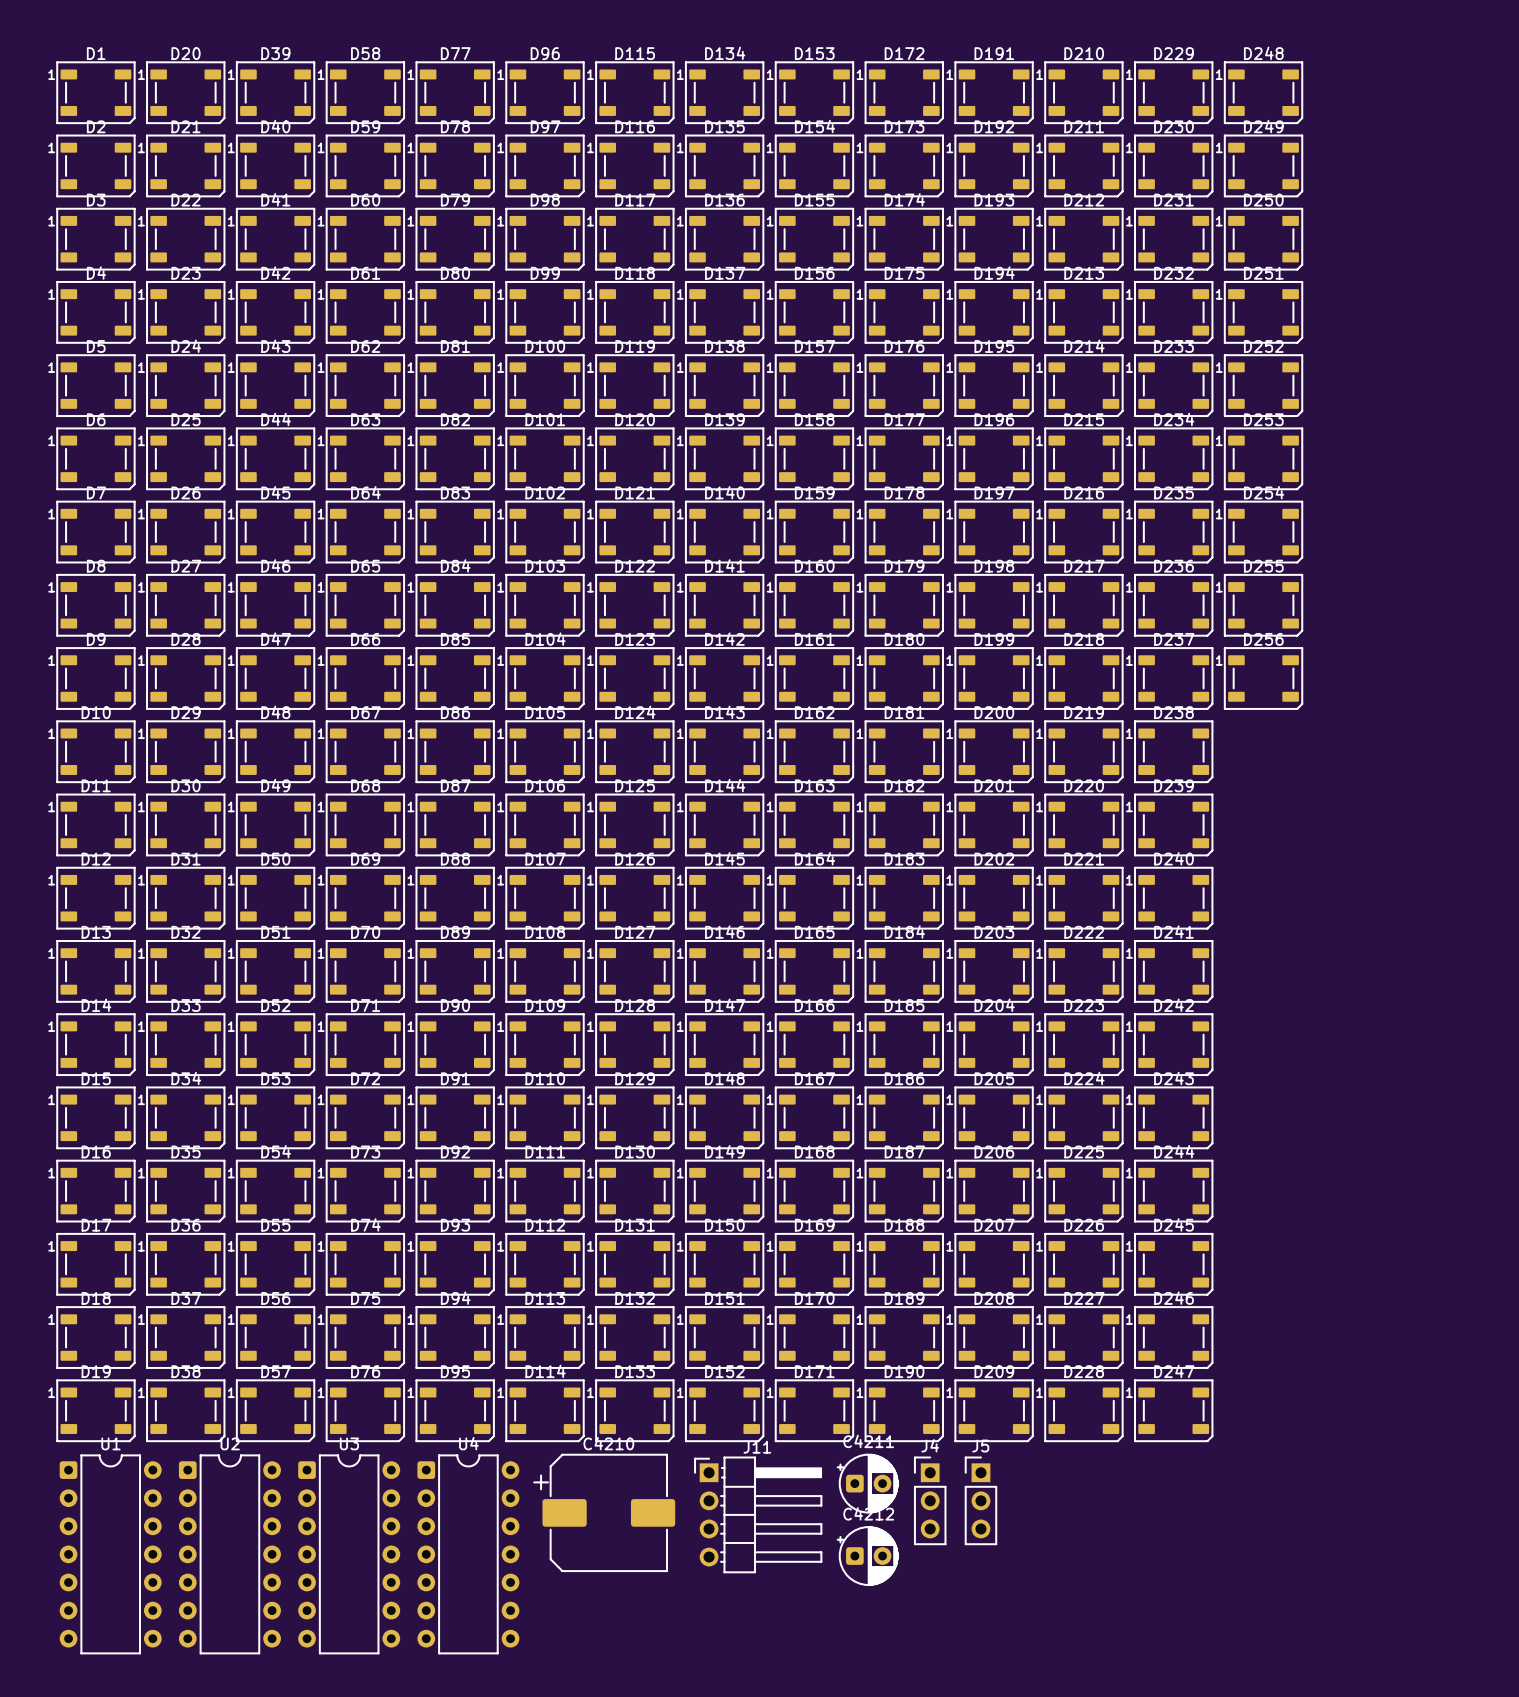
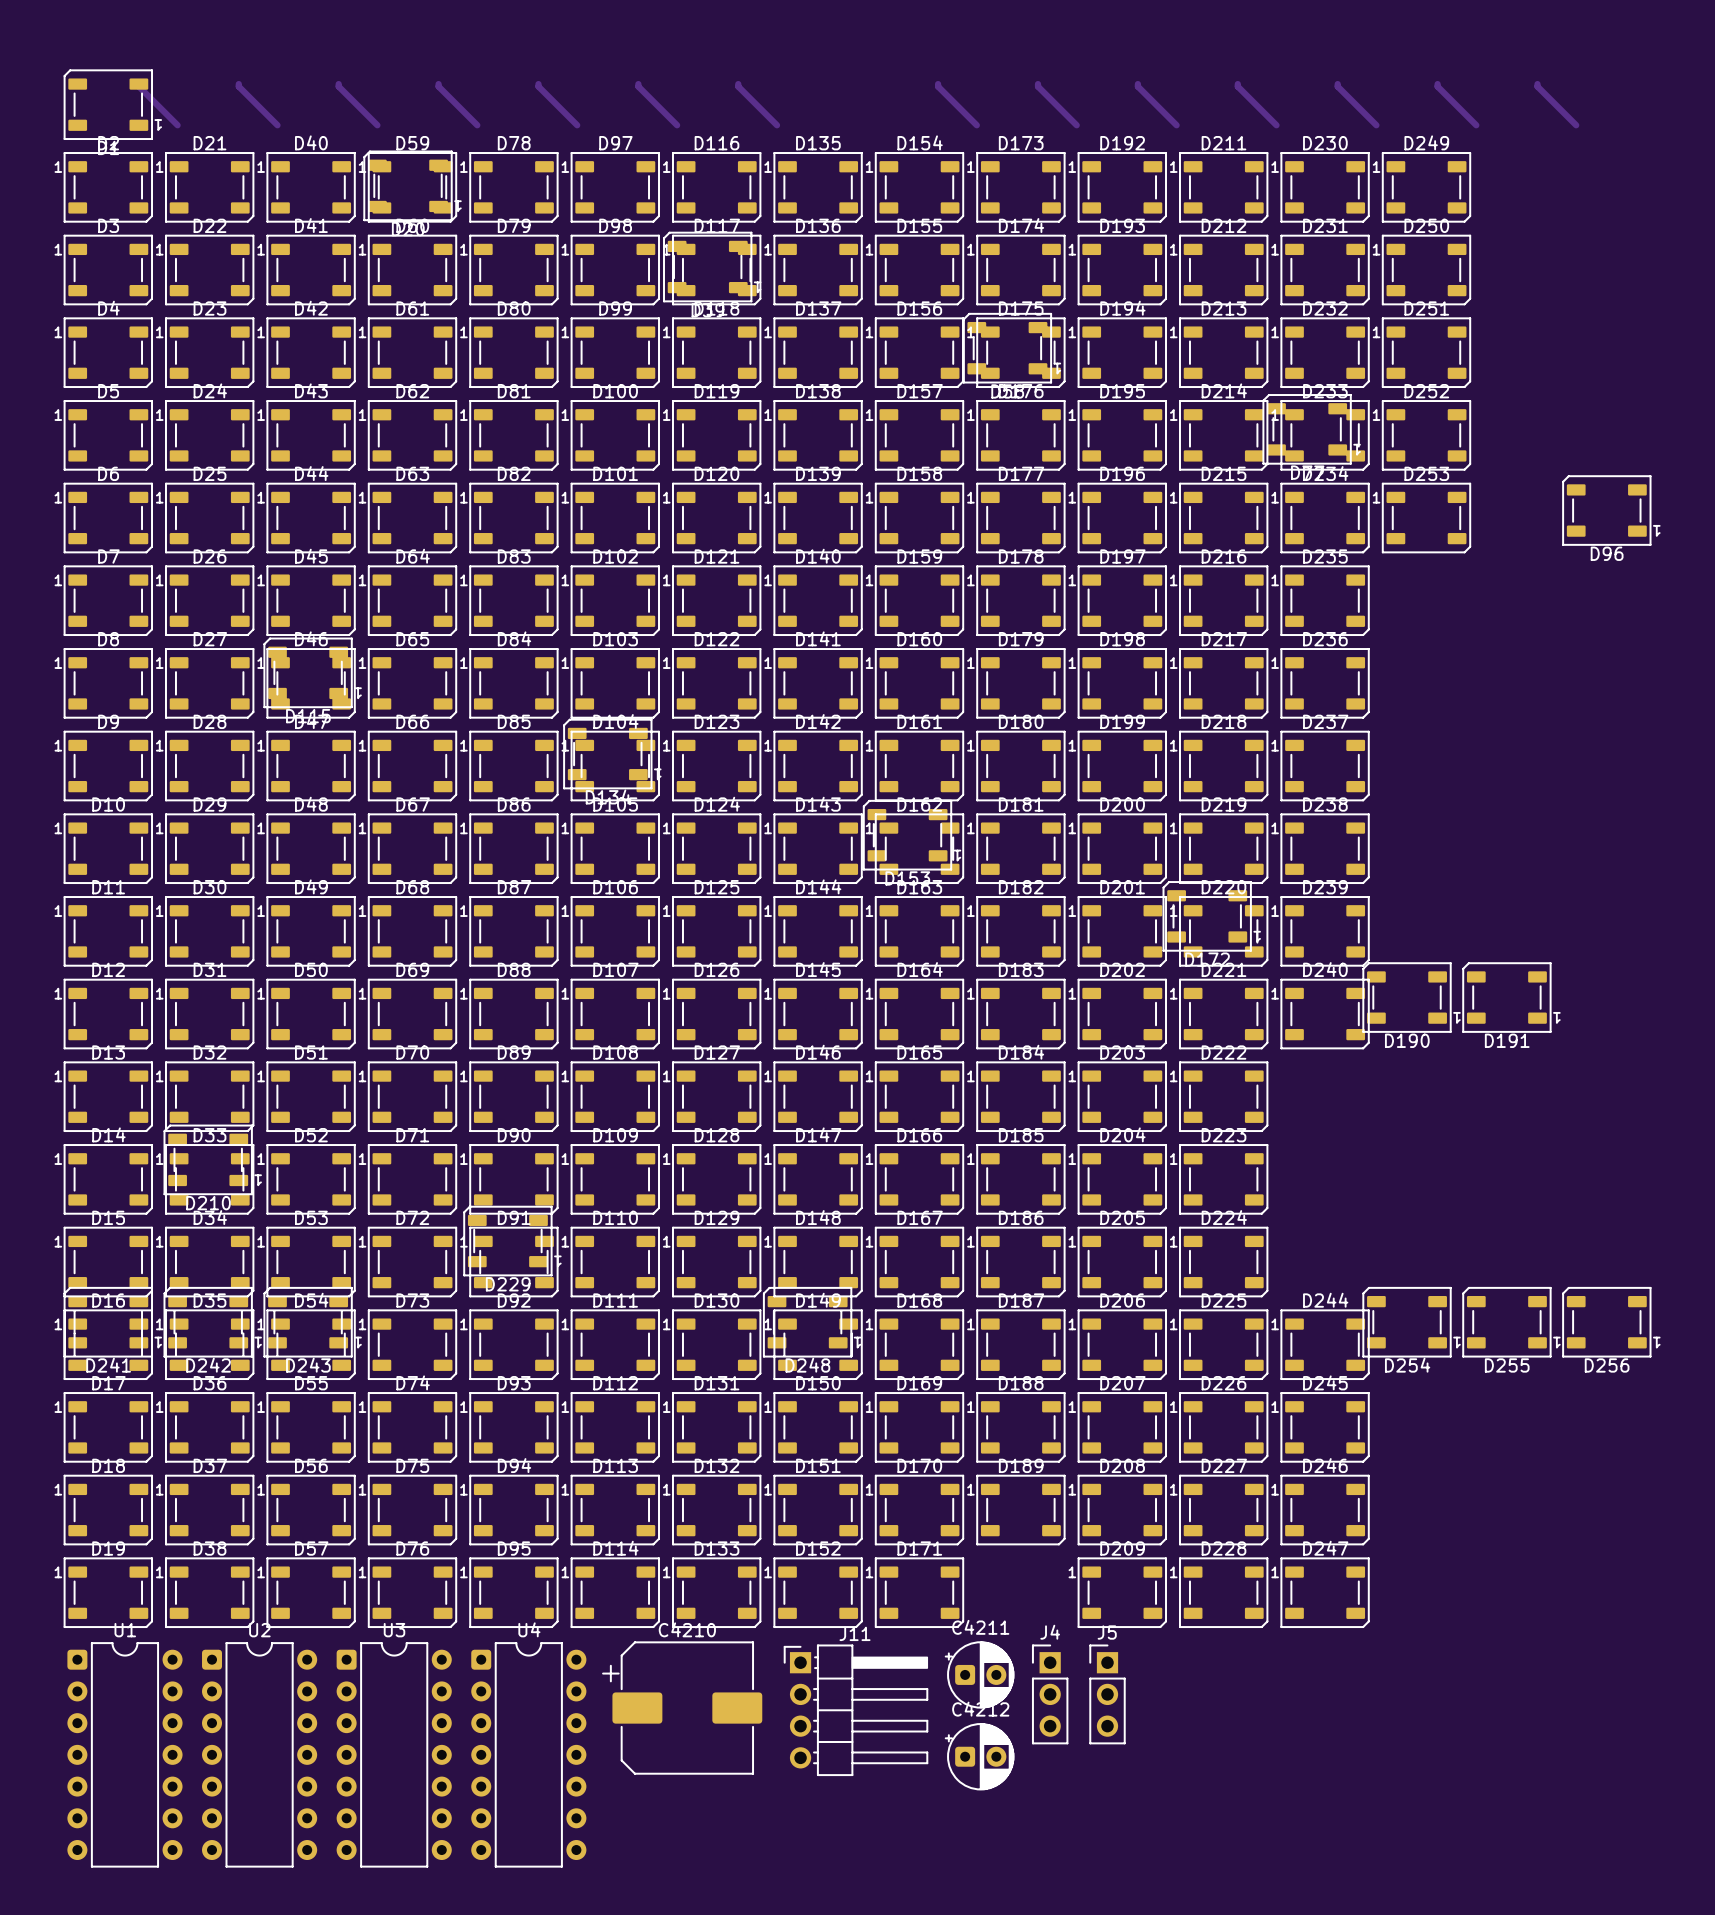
track: none -> (138, 84) (138, 86) (177, 125)
track: none -> (238, 84) (238, 86) (277, 125)
track: none -> (338, 84) (338, 86) (377, 125)
track: none -> (438, 84) (438, 86) (477, 125)
track: none -> (538, 84) (538, 86) (577, 125)
track: none -> (638, 84) (638, 86) (677, 125)
track: none -> (738, 84) (738, 86) (777, 125)
track: none -> (938, 84) (938, 86) (976, 125)
track: none -> (1038, 84) (1038, 86) (1076, 125)
track: none -> (1137, 84) (1137, 86) (1176, 125)
track: none -> (1237, 84) (1237, 86) (1276, 125)
track: none -> (1337, 84) (1337, 86) (1376, 125)
track: none -> (1437, 84) (1437, 86) (1476, 125)
track: none -> (1537, 84) (1537, 86) (1576, 125)
D1 rotation: 0° (95, 92) -> 180° (108, 104)
D20 rotation: 0° (185, 92) -> 180° (408, 185)
D20 position: (185, 92) -> (408, 185)
D39 rotation: 0° (275, 92) -> 180° (707, 267)
D39 position: (275, 92) -> (707, 267)
D58 rotation: 0° (365, 92) -> 180° (1007, 348)
D58 position: (365, 92) -> (1007, 348)
D77 rotation: 0° (455, 92) -> 180° (1307, 429)
D77 position: (455, 92) -> (1307, 429)
D96 rotation: 0° (545, 92) -> 180° (1606, 510)
D96 position: (545, 92) -> (1606, 510)
D115 rotation: 0° (634, 92) -> 180° (308, 672)
D115 position: (634, 92) -> (308, 672)
D134 rotation: 0° (724, 92) -> 180° (607, 754)
D134 position: (724, 92) -> (607, 754)
D153 rotation: 0° (814, 92) -> 180° (907, 835)
D153 position: (814, 92) -> (907, 835)
D172 rotation: 0° (904, 92) -> 180° (1207, 916)
D172 position: (904, 92) -> (1207, 916)
D191 rotation: 0° (994, 92) -> 180° (1506, 997)
D191 position: (994, 92) -> (1506, 997)
D210 rotation: 0° (1083, 92) -> 180° (208, 1159)
D210 position: (1083, 92) -> (208, 1159)
D229 rotation: 0° (1173, 92) -> 180° (507, 1241)
D229 position: (1173, 92) -> (507, 1241)
D248 rotation: 0° (1263, 92) -> 180° (807, 1322)
D248 position: (1263, 92) -> (807, 1322)
D254 rotation: 0° (1263, 532) -> 180° (1407, 1322)
D254 position: (1263, 532) -> (1407, 1322)
D255 rotation: 0° (1263, 605) -> 180° (1506, 1322)
D255 position: (1263, 605) -> (1506, 1322)
D256 rotation: 0° (1263, 678) -> 180° (1606, 1322)
D256 position: (1263, 678) -> (1606, 1322)
D241 rotation: 0° (1173, 971) -> 180° (108, 1322)
D241 position: (1173, 971) -> (108, 1322)
D242 rotation: 0° (1173, 1044) -> 180° (208, 1322)
D242 position: (1173, 1044) -> (208, 1322)
D243 rotation: 0° (1173, 1117) -> 180° (308, 1322)
D243 position: (1173, 1117) -> (308, 1322)
D190 rotation: 0° (904, 1410) -> 180° (1407, 997)
D190 position: (904, 1410) -> (1407, 997)

